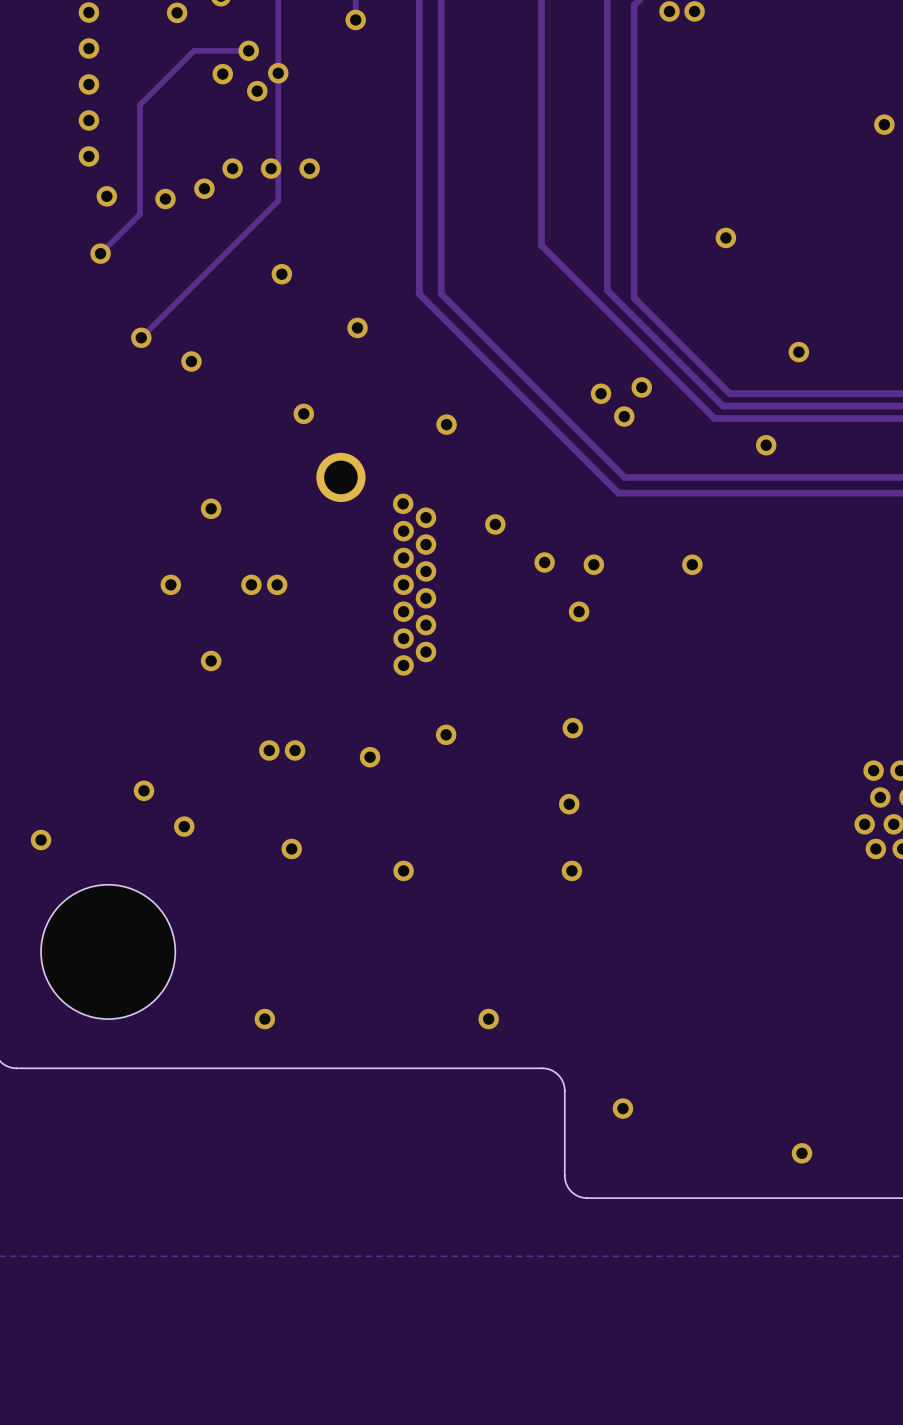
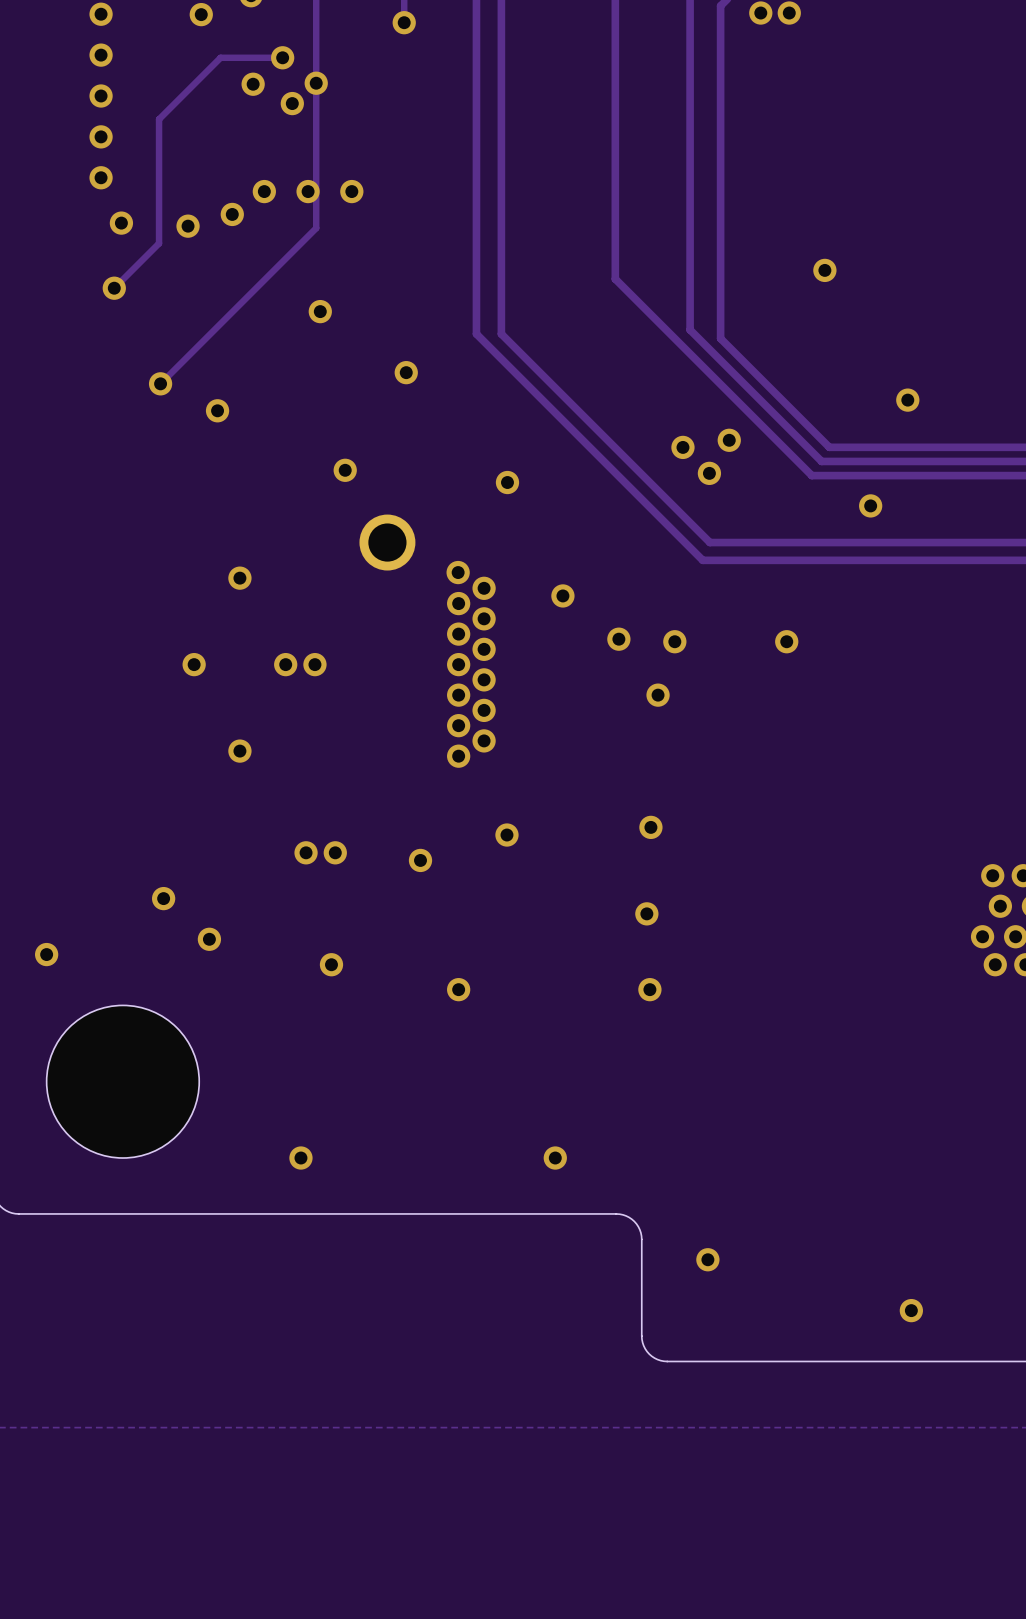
via: (884, 124) -> none

